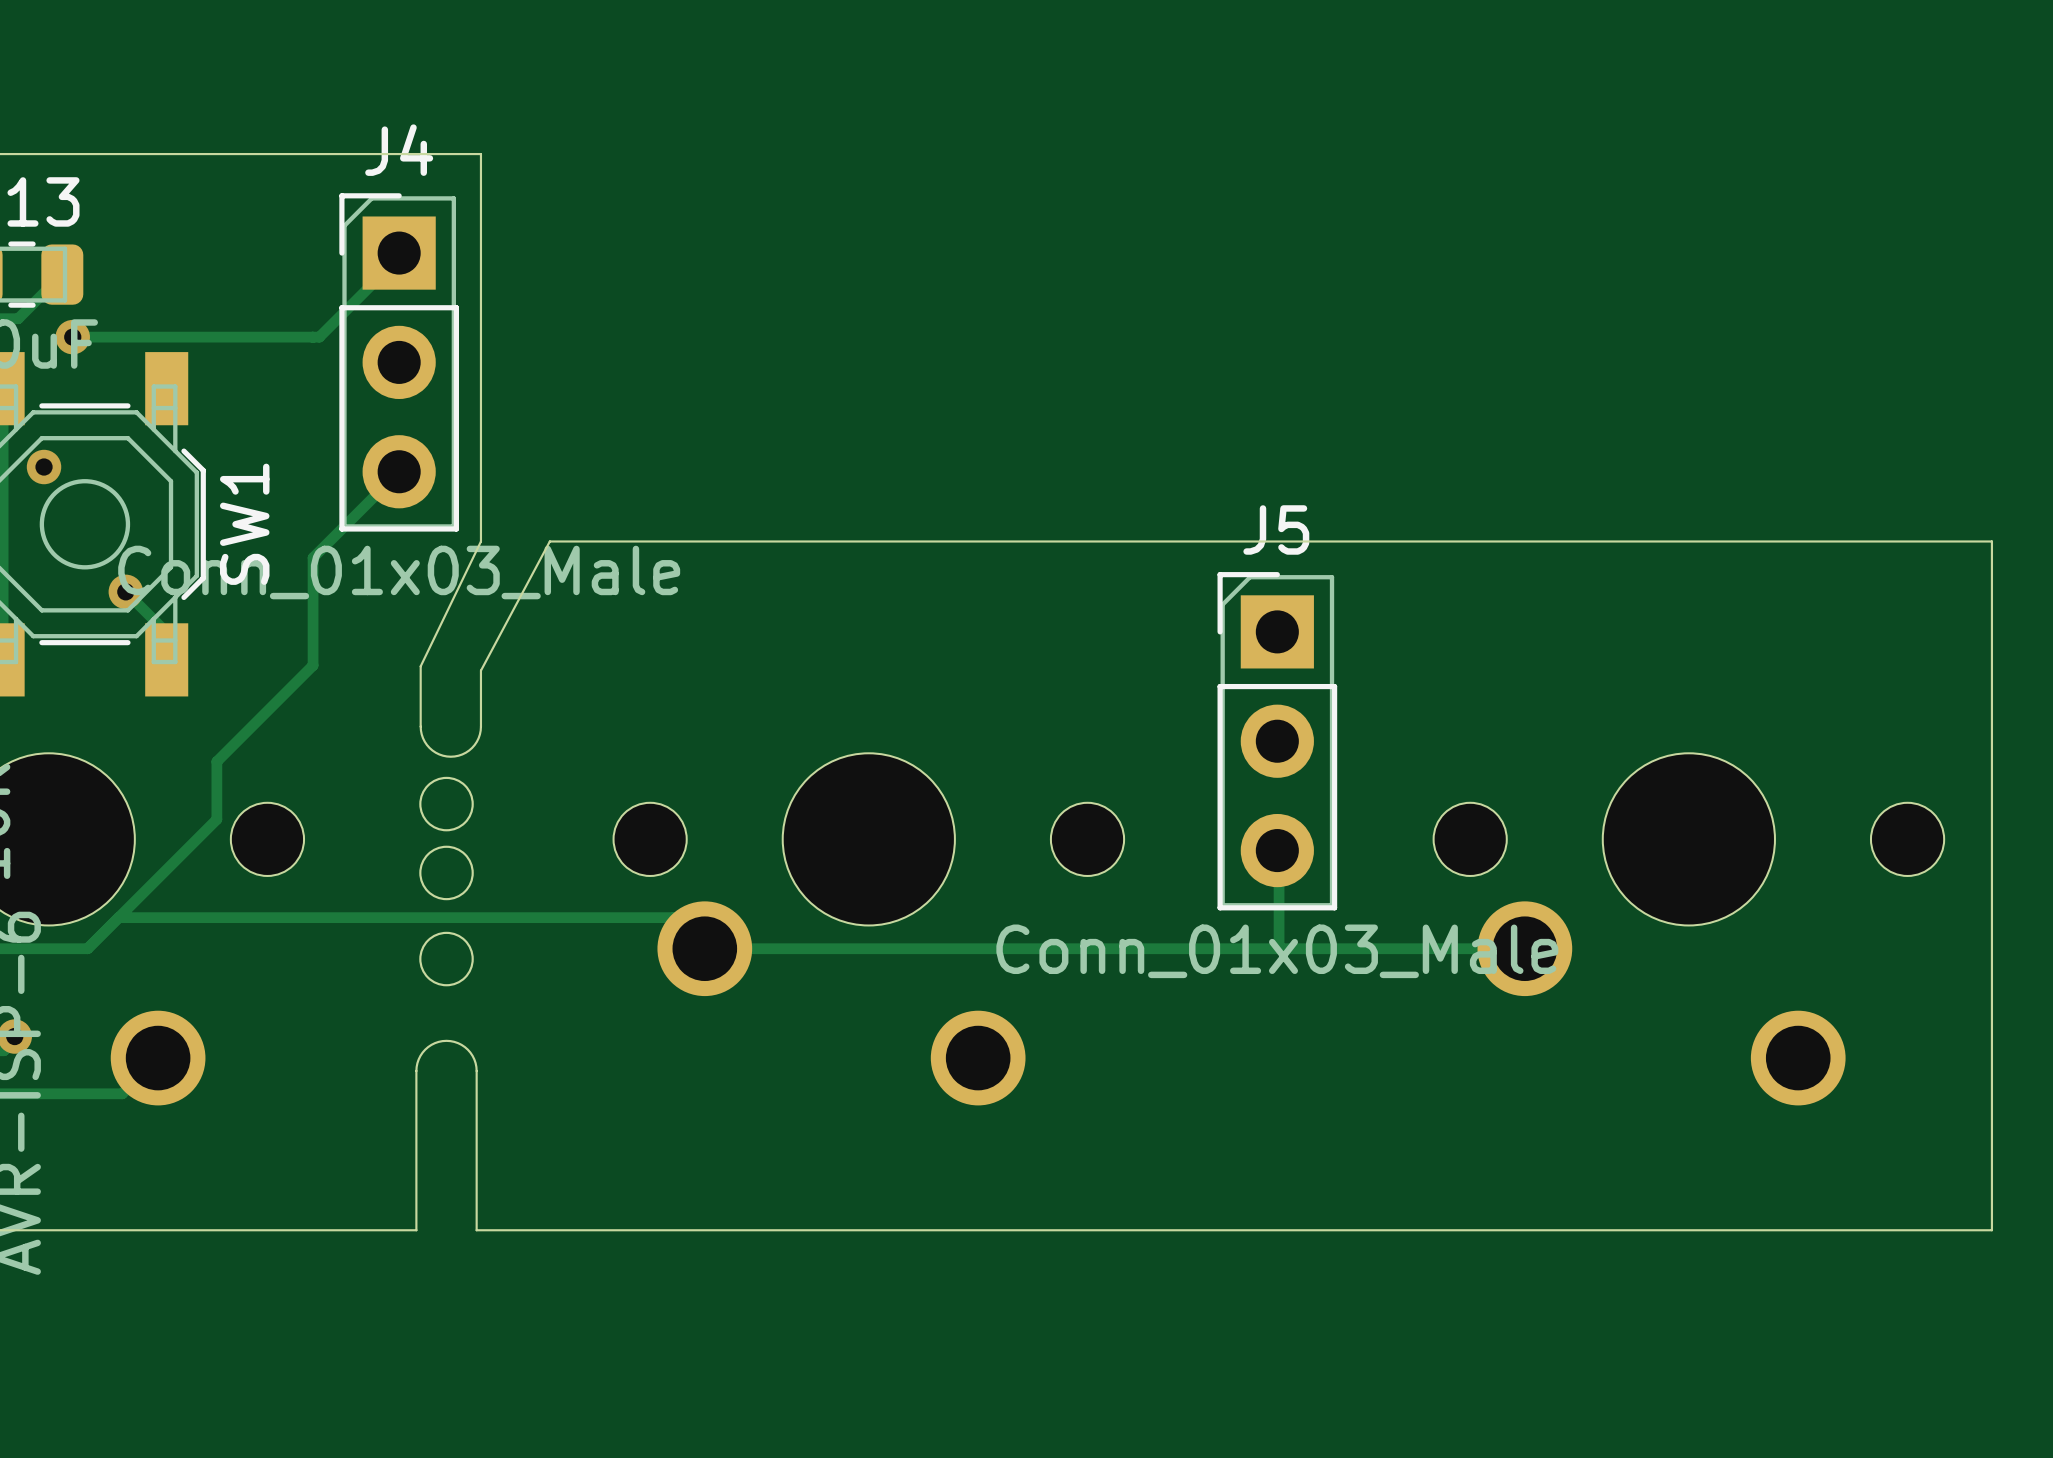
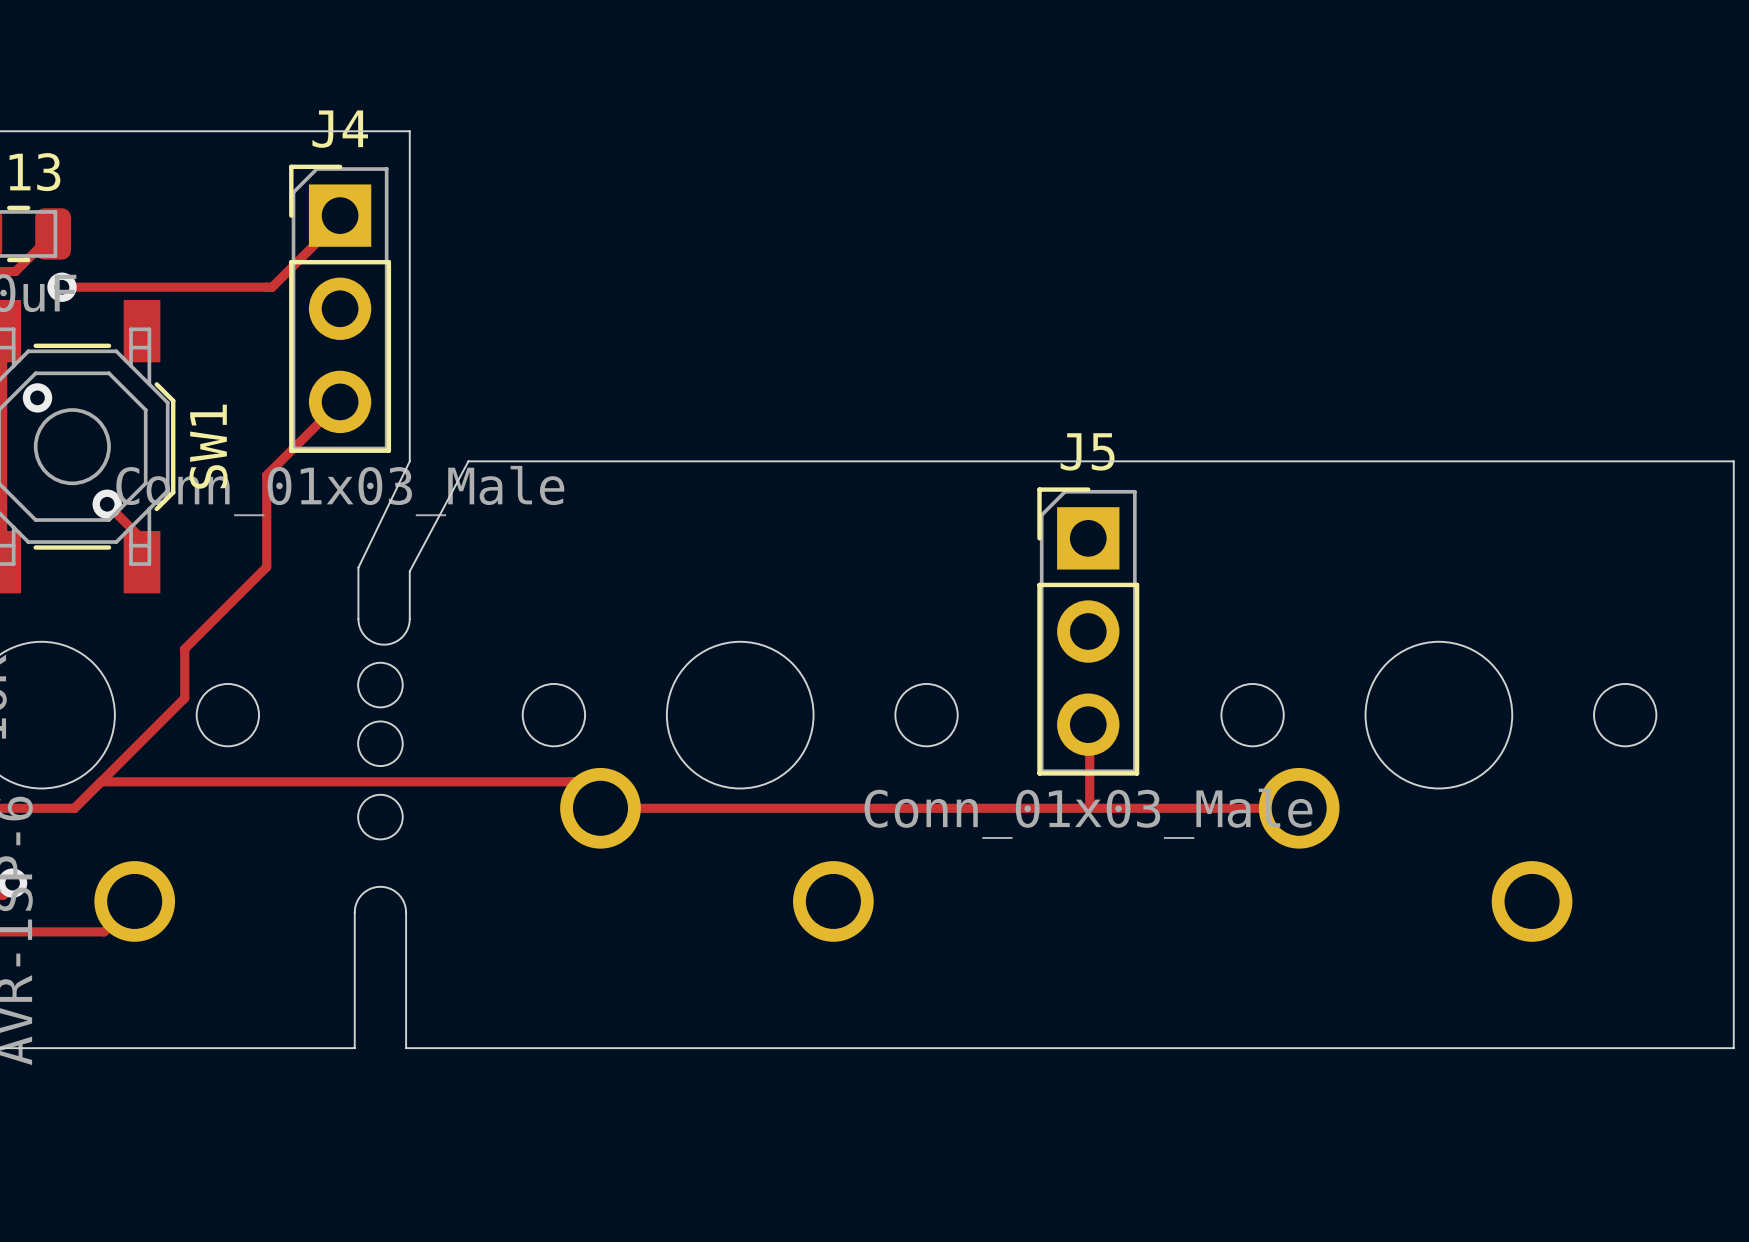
board edge: (1991, 541) (1991, 1230) -> (1697, 461) (1733, 461) (1733, 1048) (1697, 1048)

